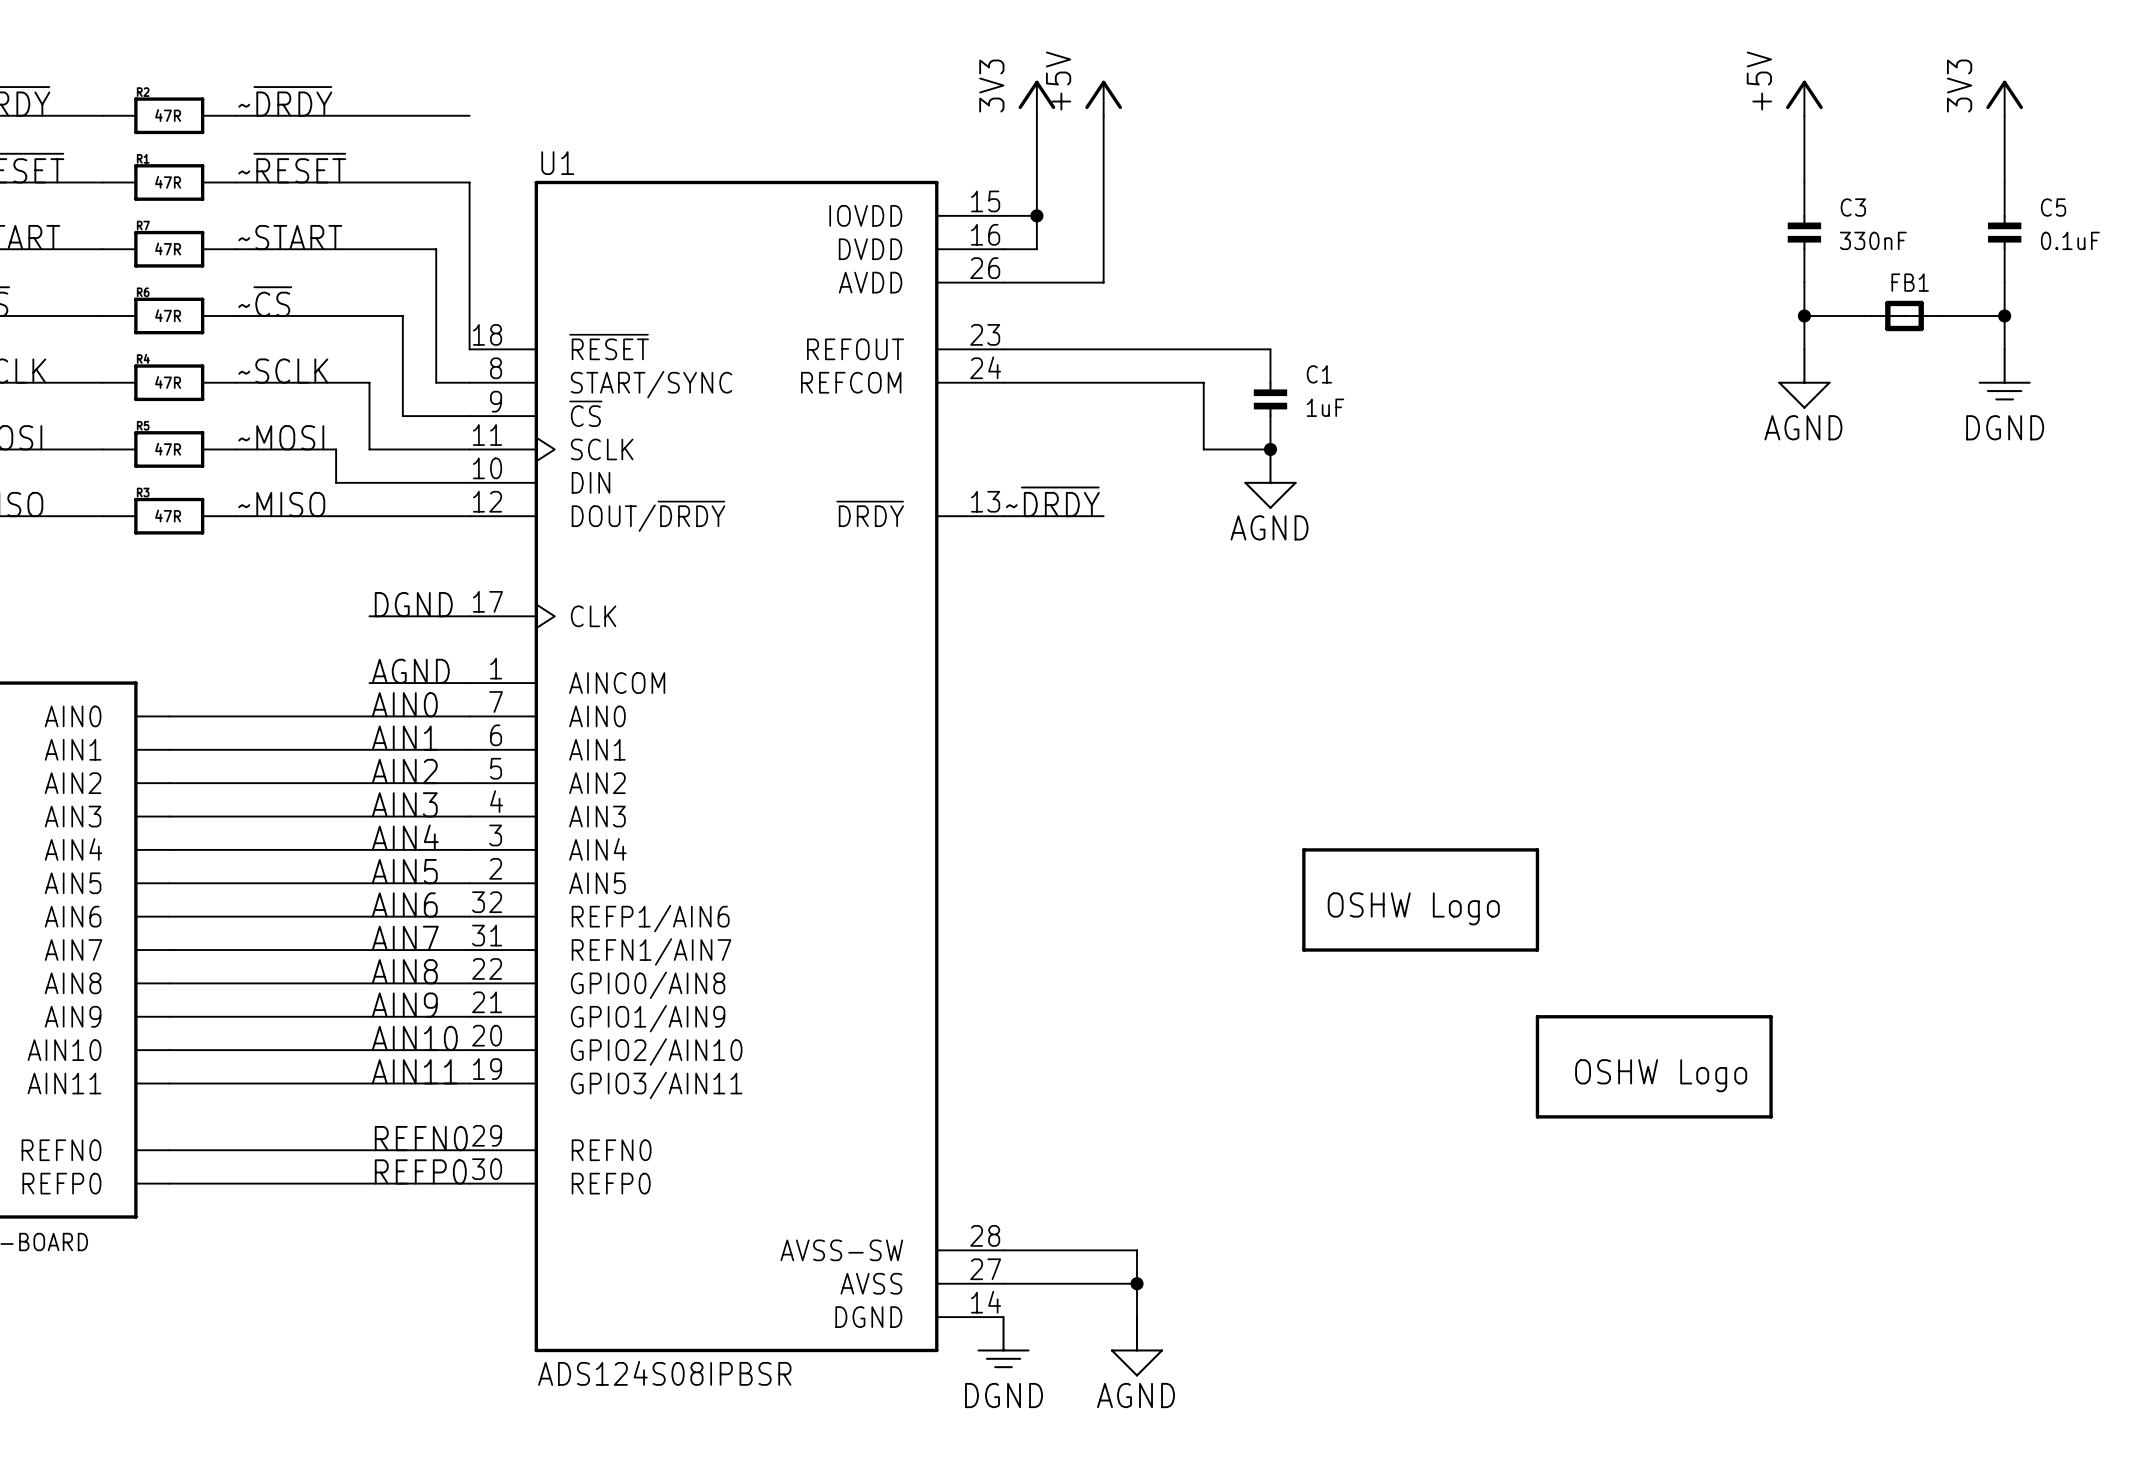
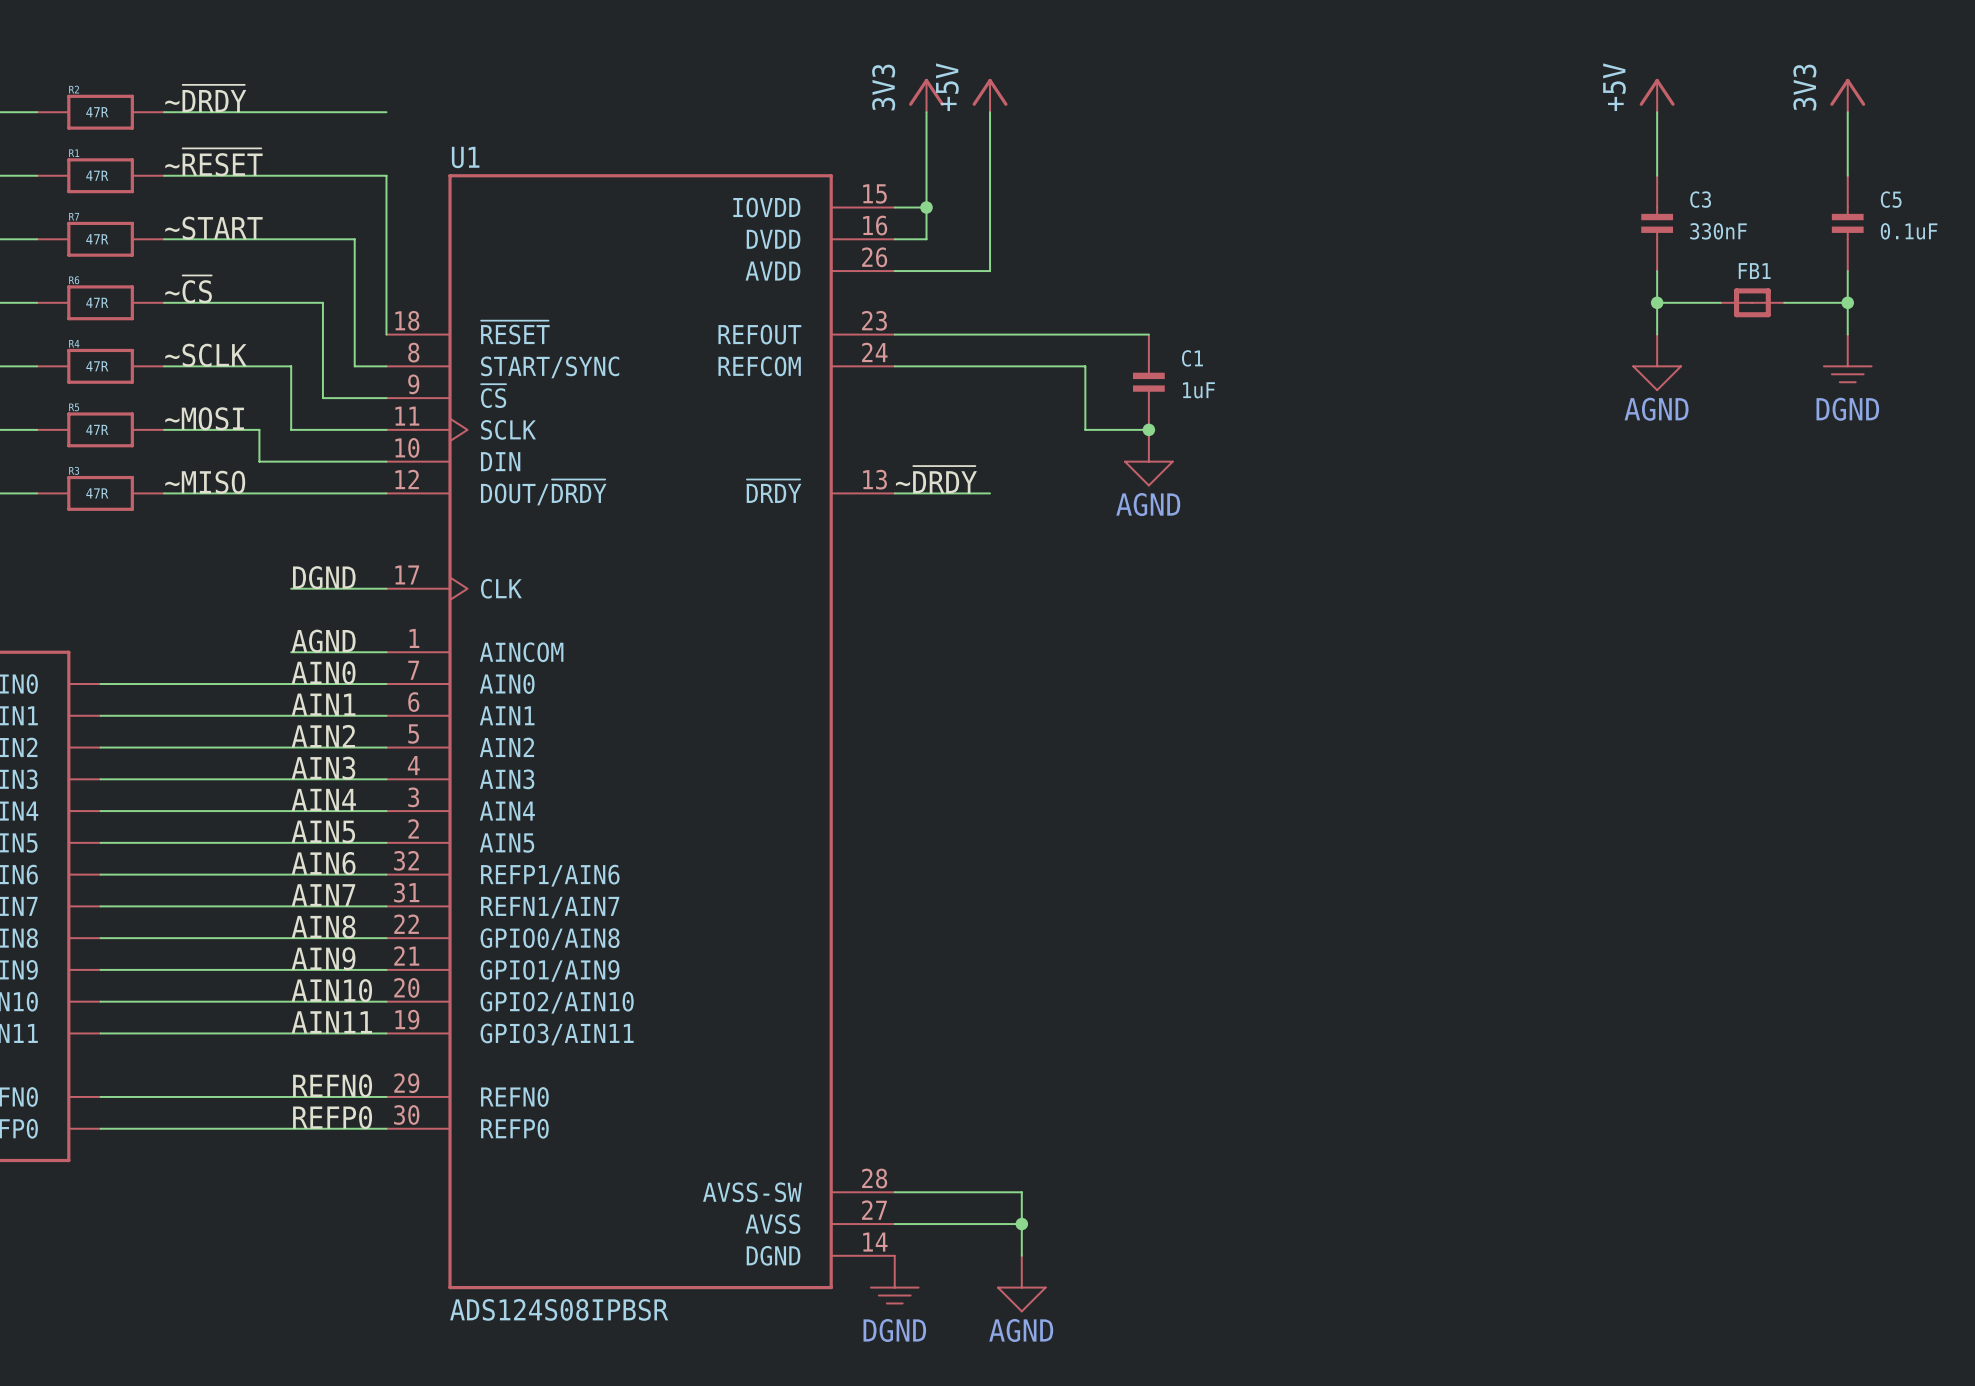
part: (1420, 899) -> none
part: (1654, 1066) -> none

